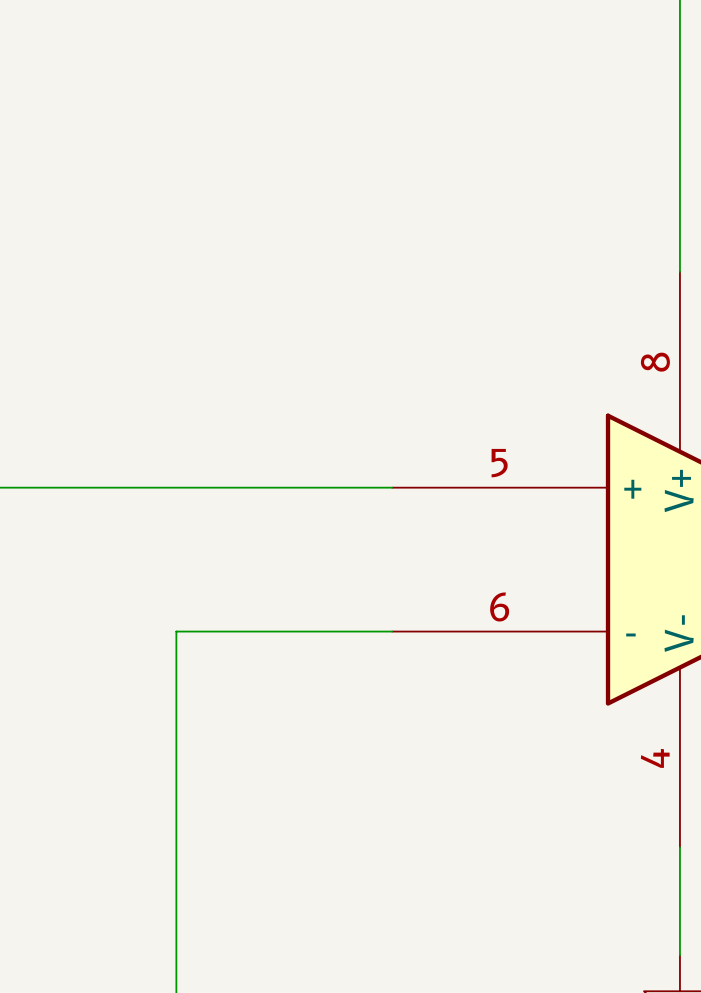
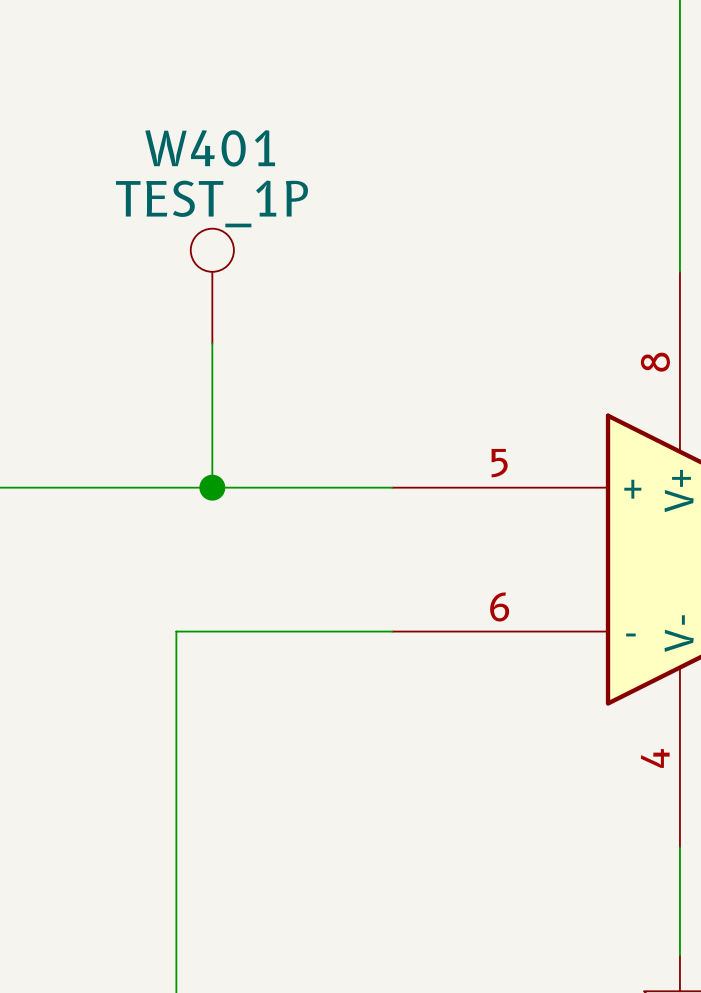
W401: none -> TEST_1P (212, 286)
wire: none -> (212, 343) (212, 487)
junction: none -> (212, 487)

